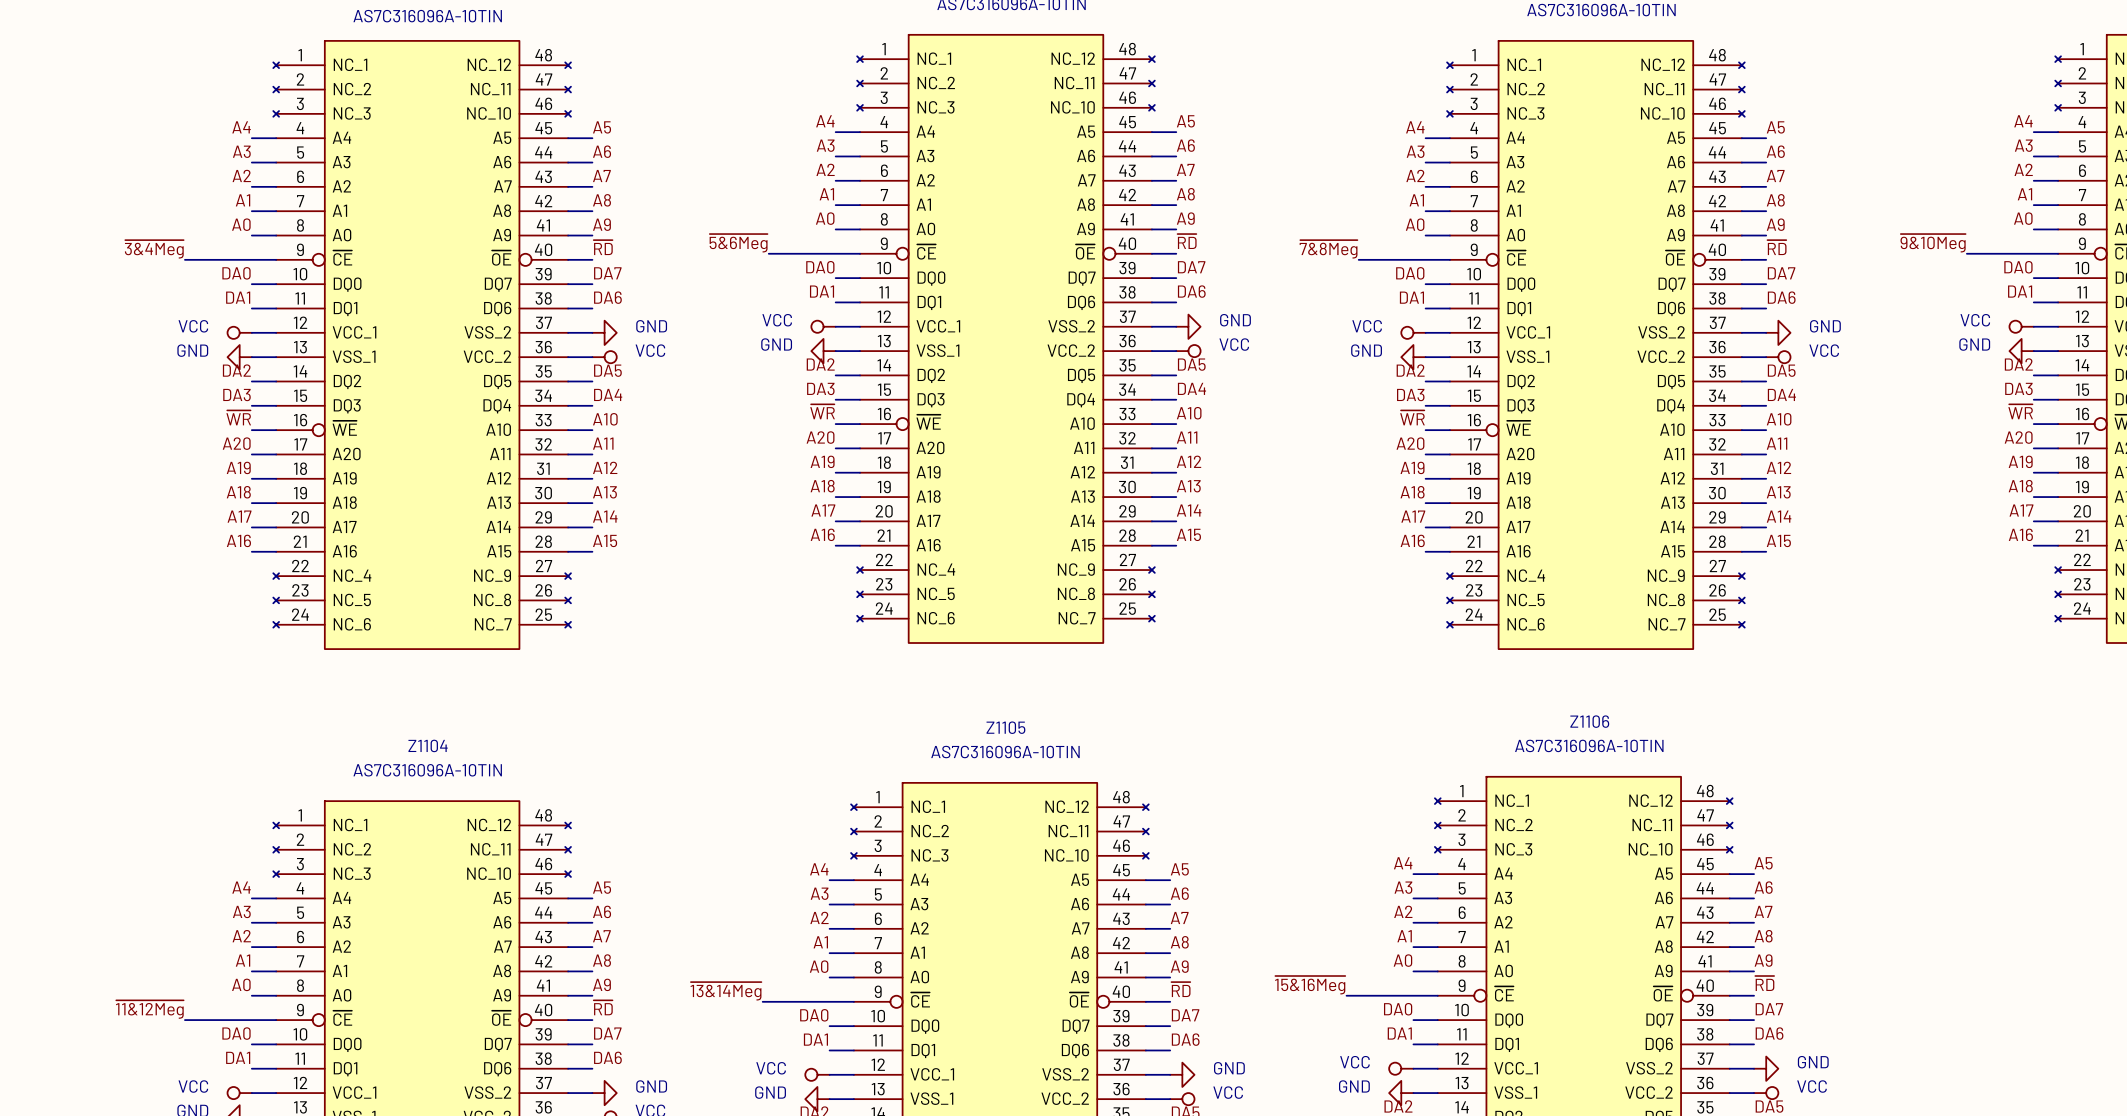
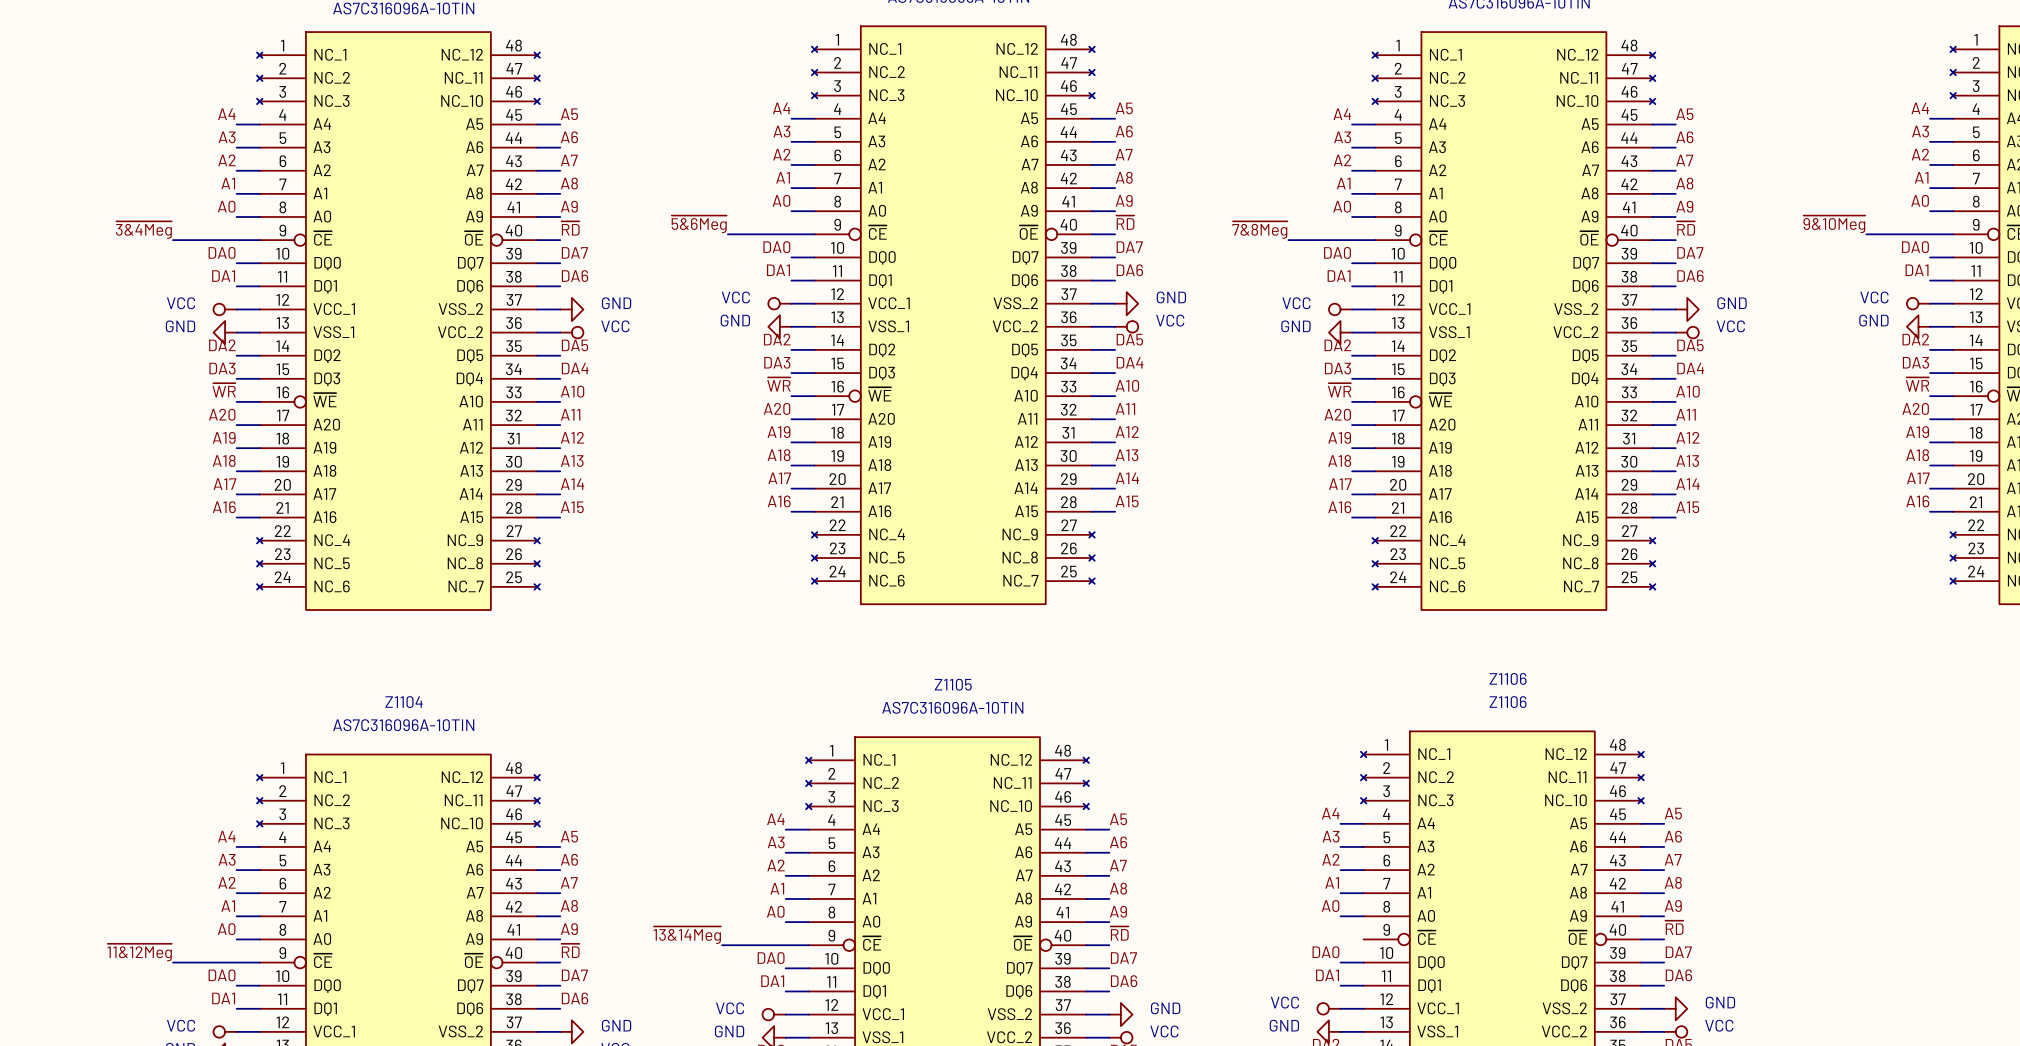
Z1106 value: AS7C316096A-10TIN (1589, 745) -> Z1106 (1508, 702)
label: ~{15&16Meg} (1310, 985) -> none
wire: (1346, 995) (1437, 995) -> none

